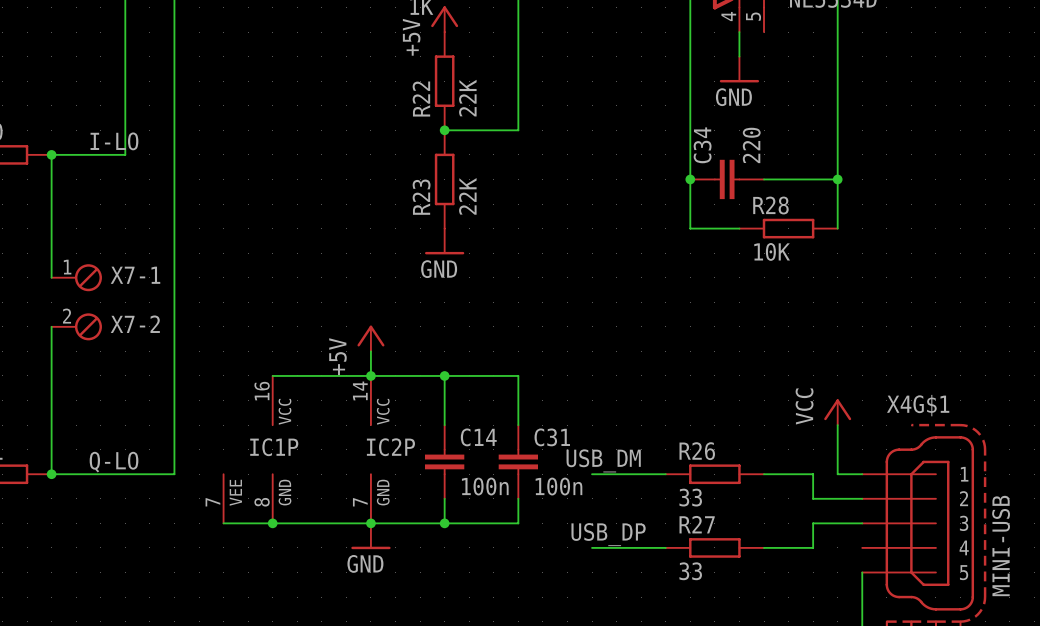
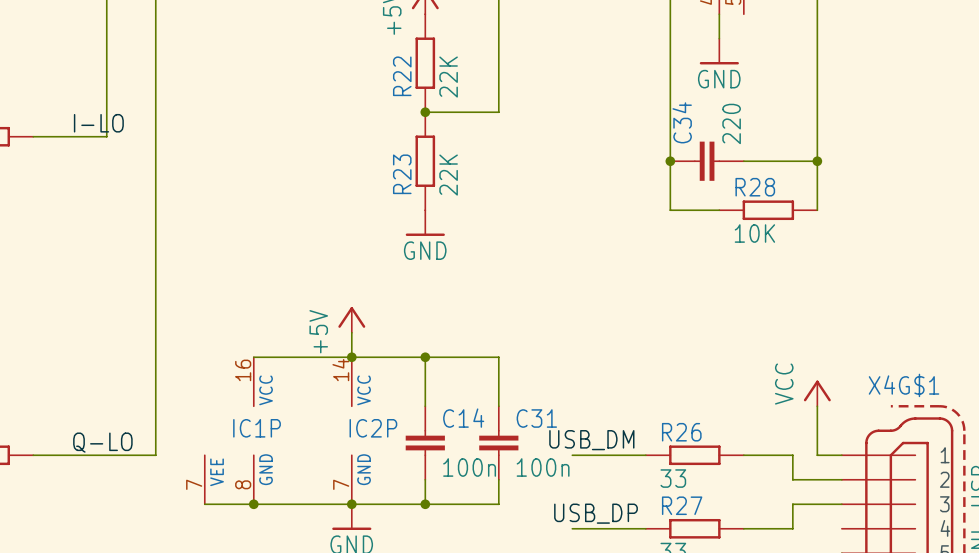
wire: (51, 154) (51, 277) -> none
junction: (51, 154) -> none
X7-1: (76, 277) -> none
wire: (51, 326) (51, 474) -> none
X7-2: (76, 326) -> none
junction: (51, 474) -> none

